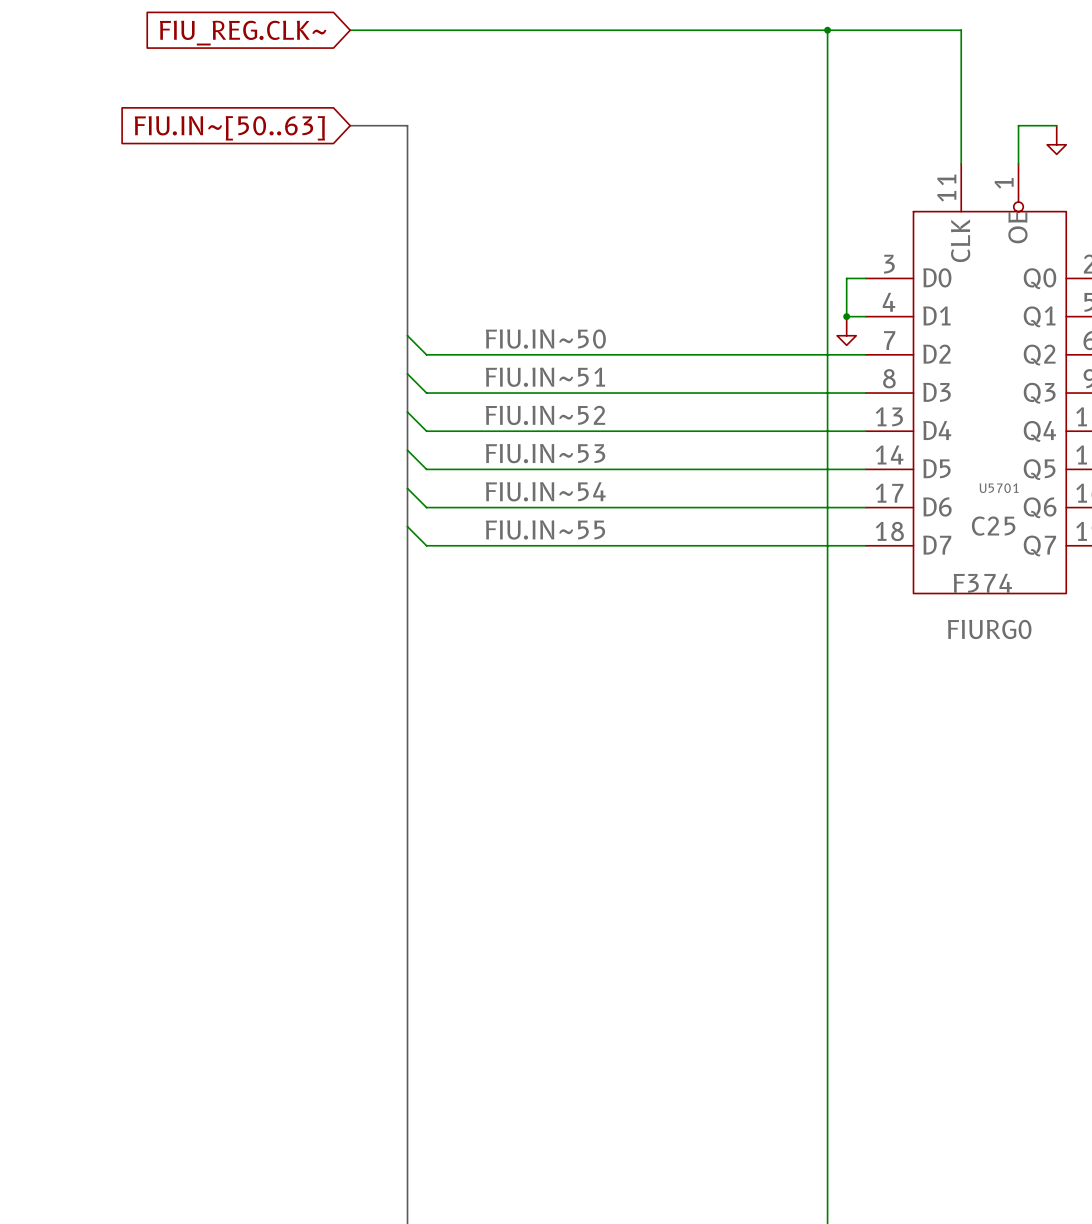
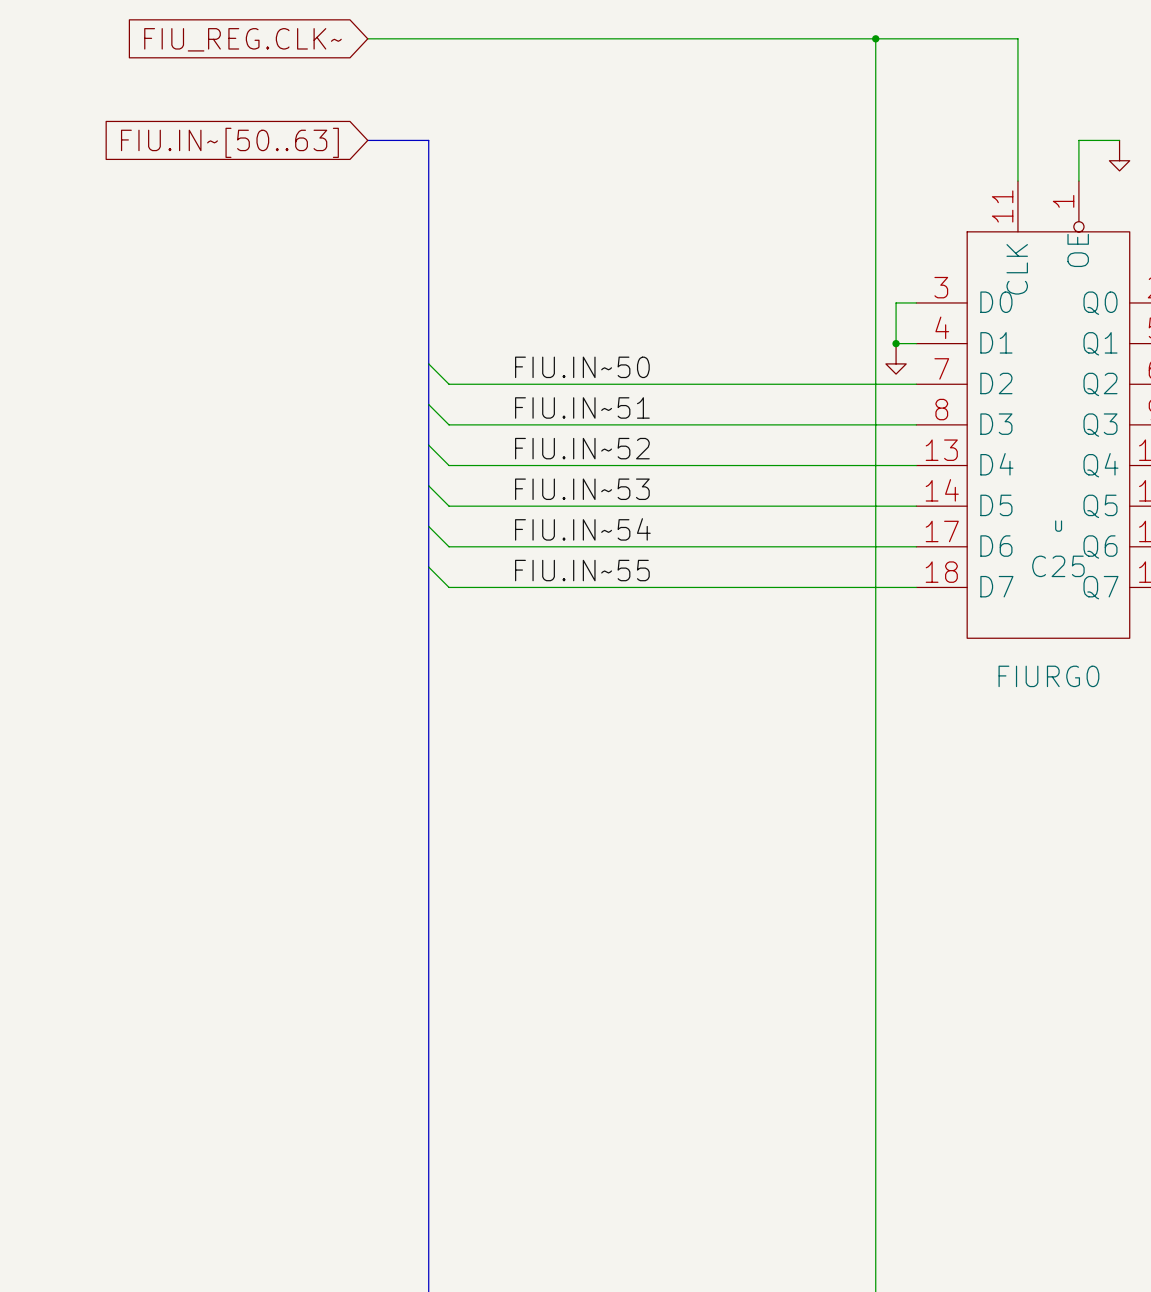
U5701 name: U5701 (999, 488) -> U (1058, 526)
U5701 value: F374 (982, 583) -> none

